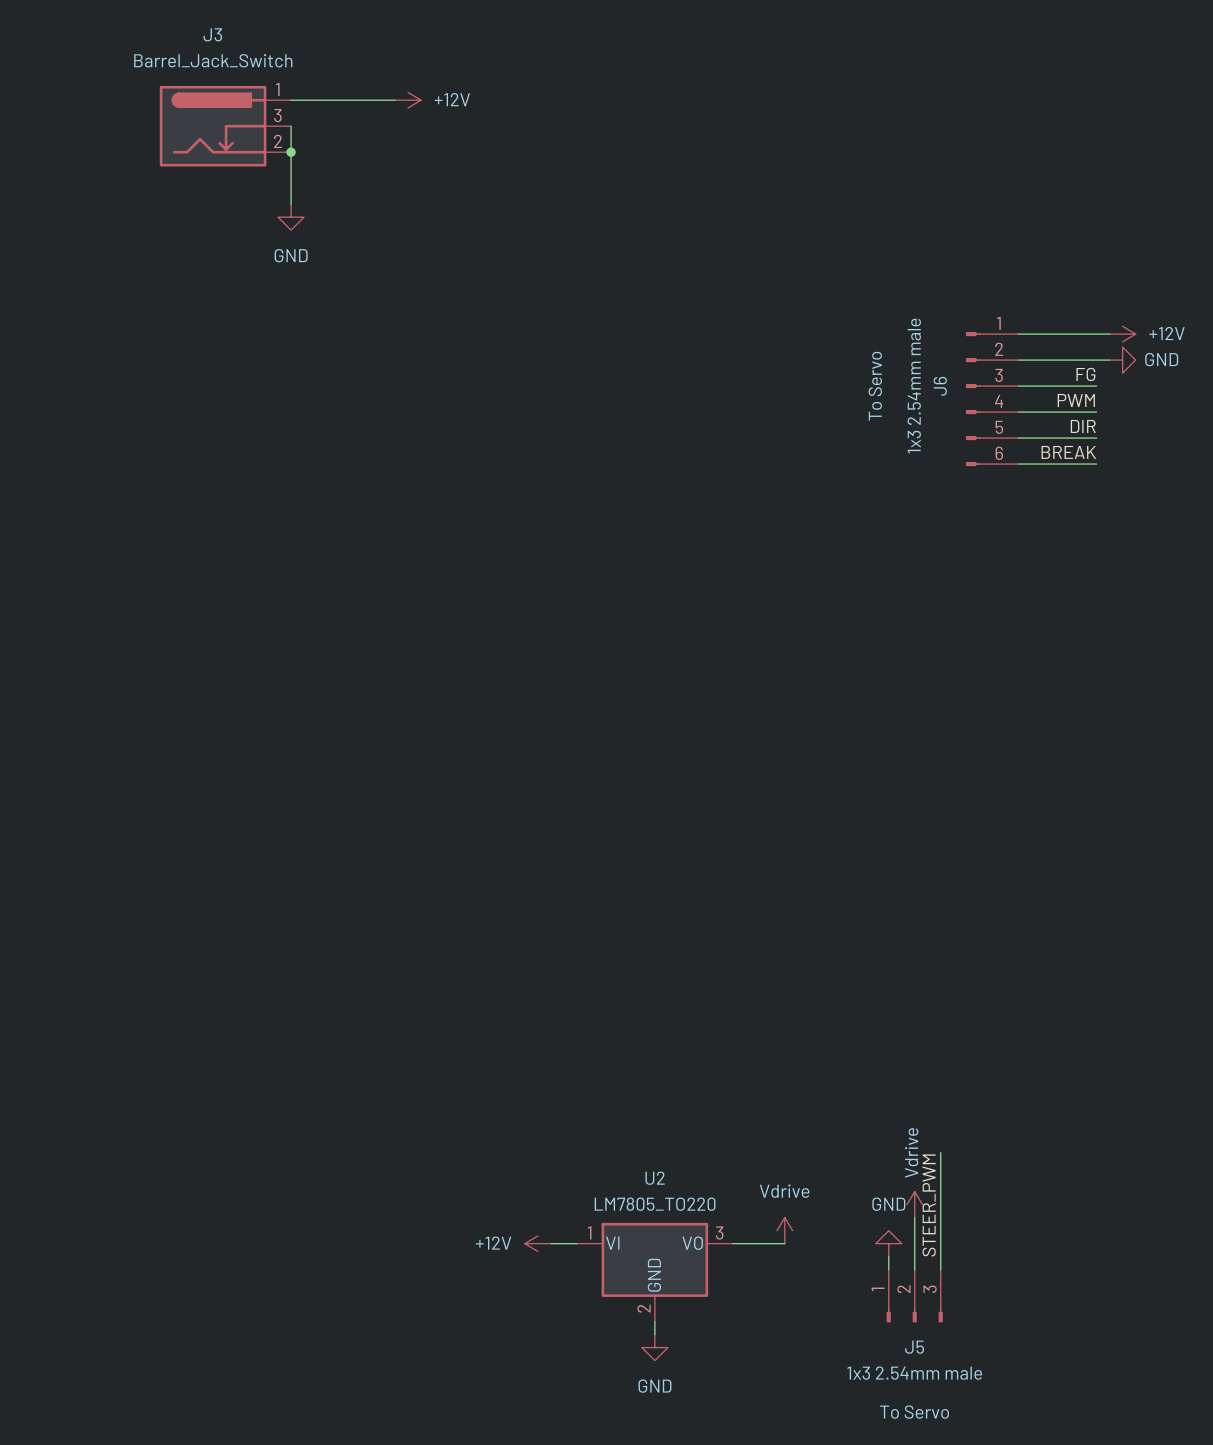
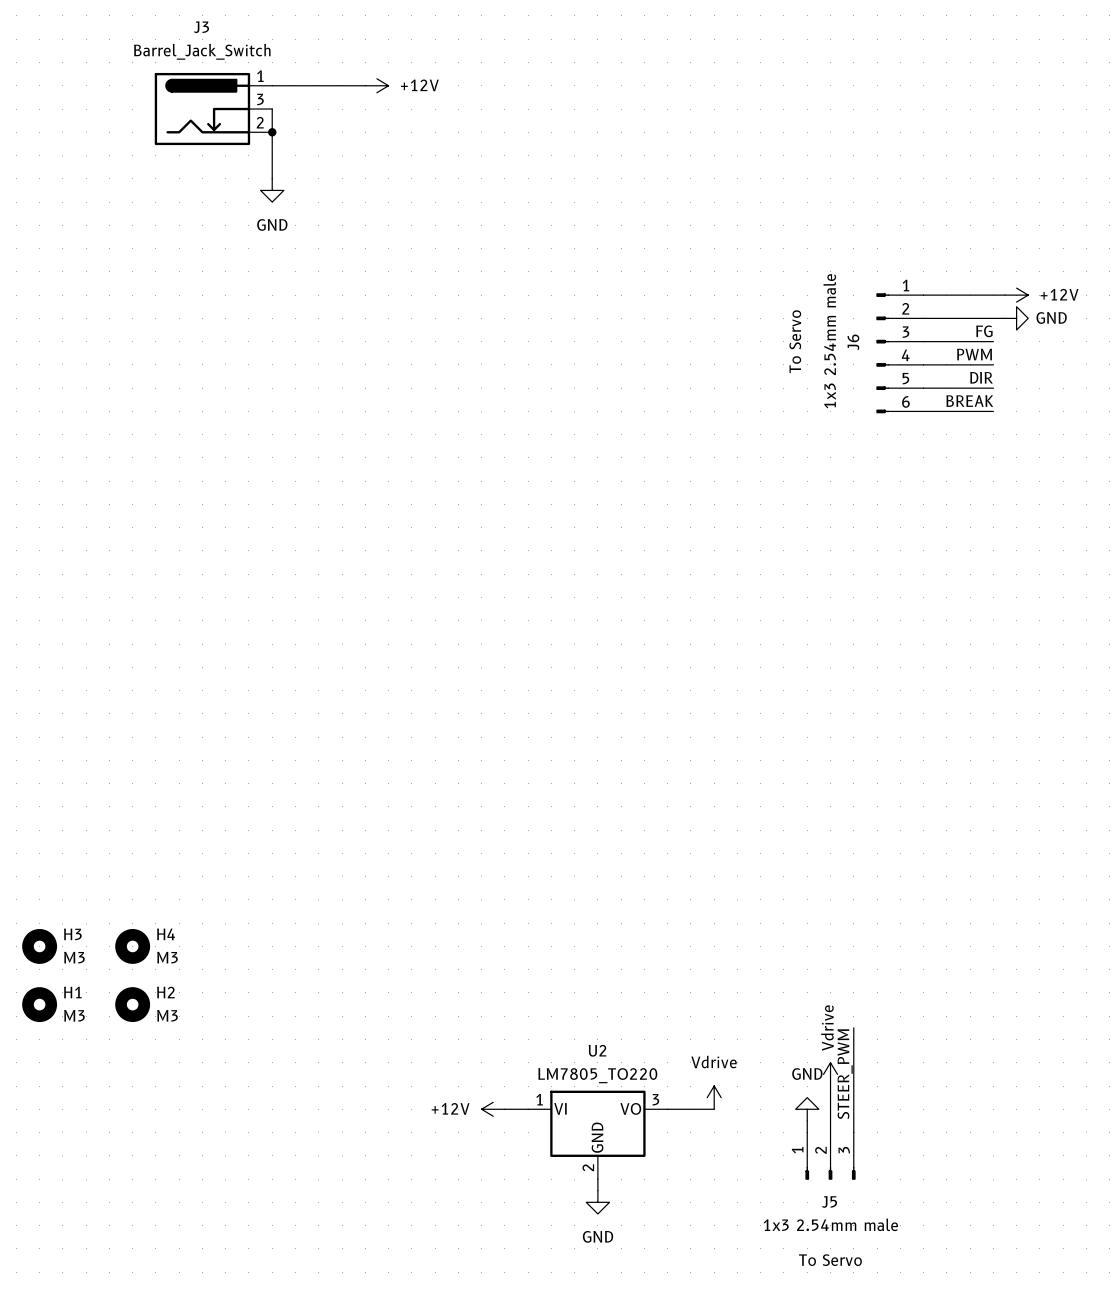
H3: none -> M3 (39, 946)
H4: none -> M3 (132, 946)
H1: none -> M3 (39, 1004)
H2: none -> M3 (132, 1004)

